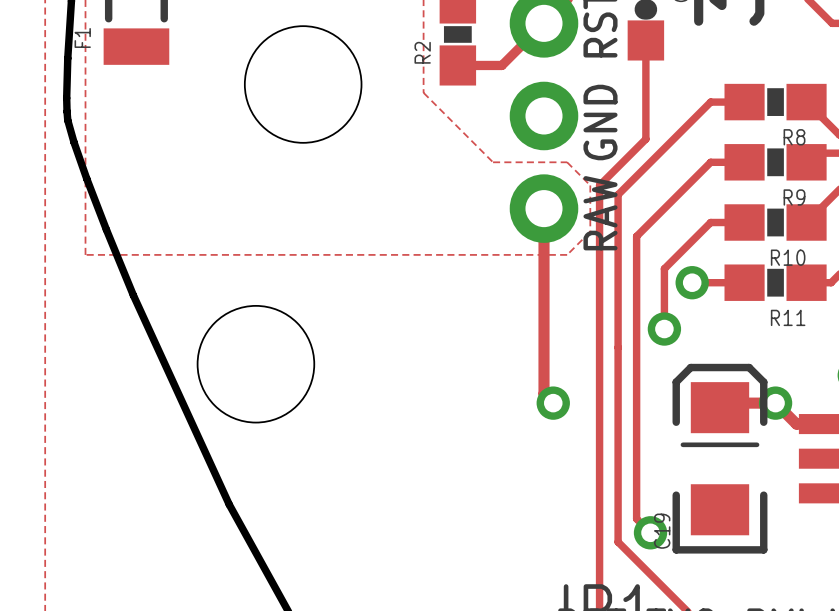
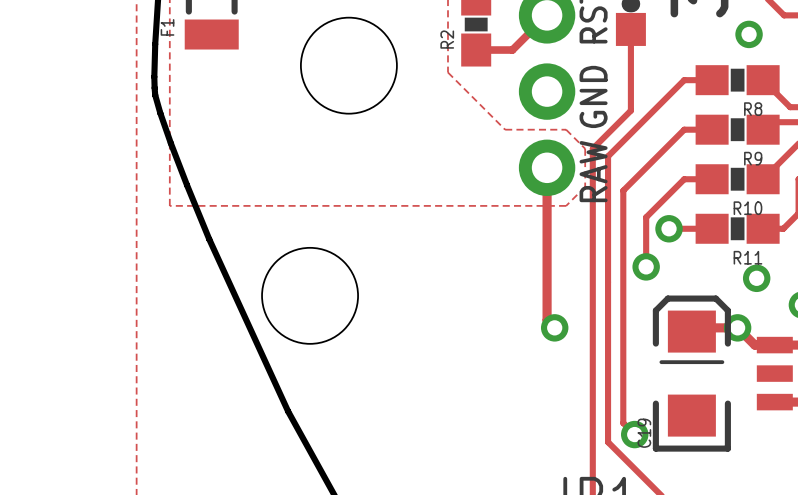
via: none -> (749, 34)
via: none -> (756, 278)

